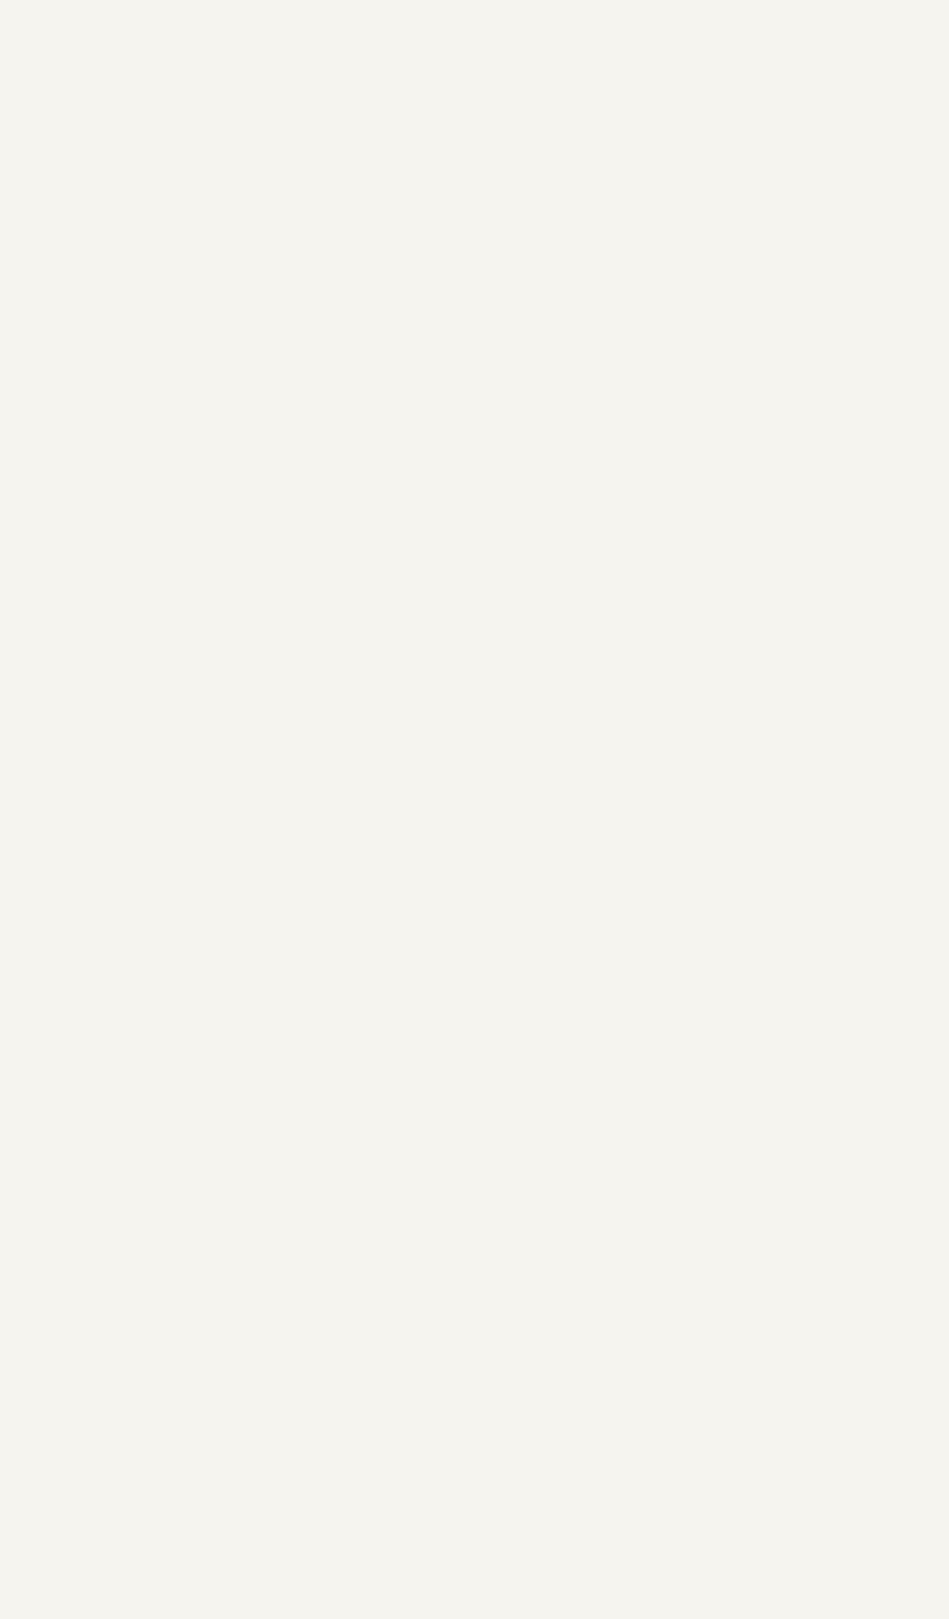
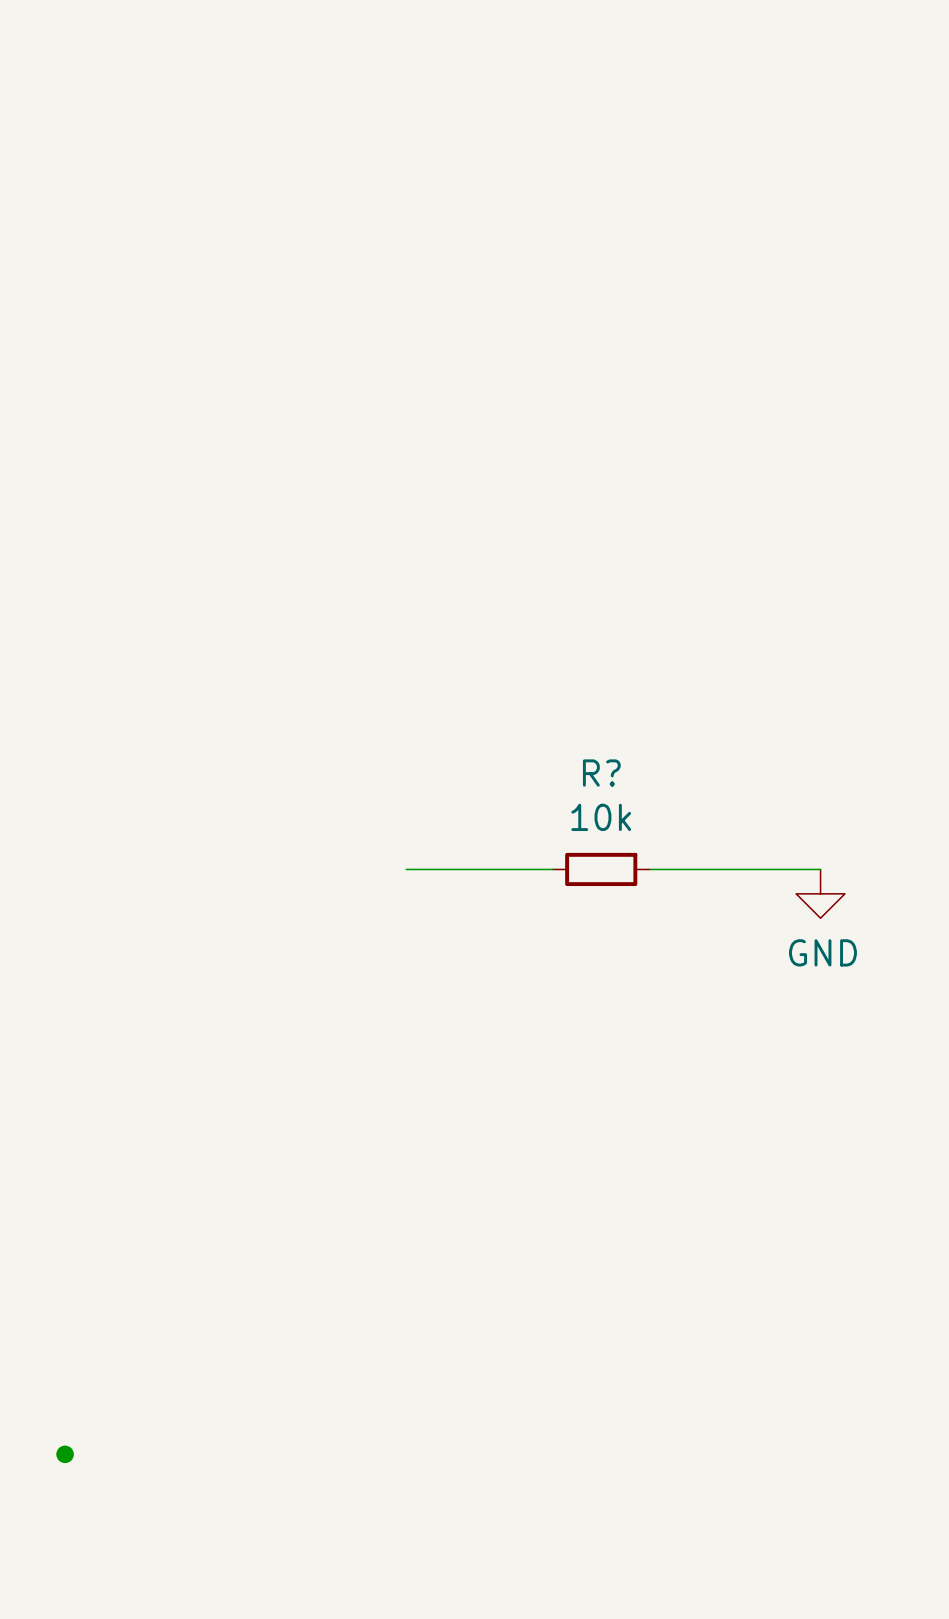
wire: none -> (406, 869) (552, 869)
R?: none -> 10k (601, 869)
wire: none -> (649, 869) (820, 869)
power symbol: none -> GND (820, 893)
junction: none -> (65, 1454)

